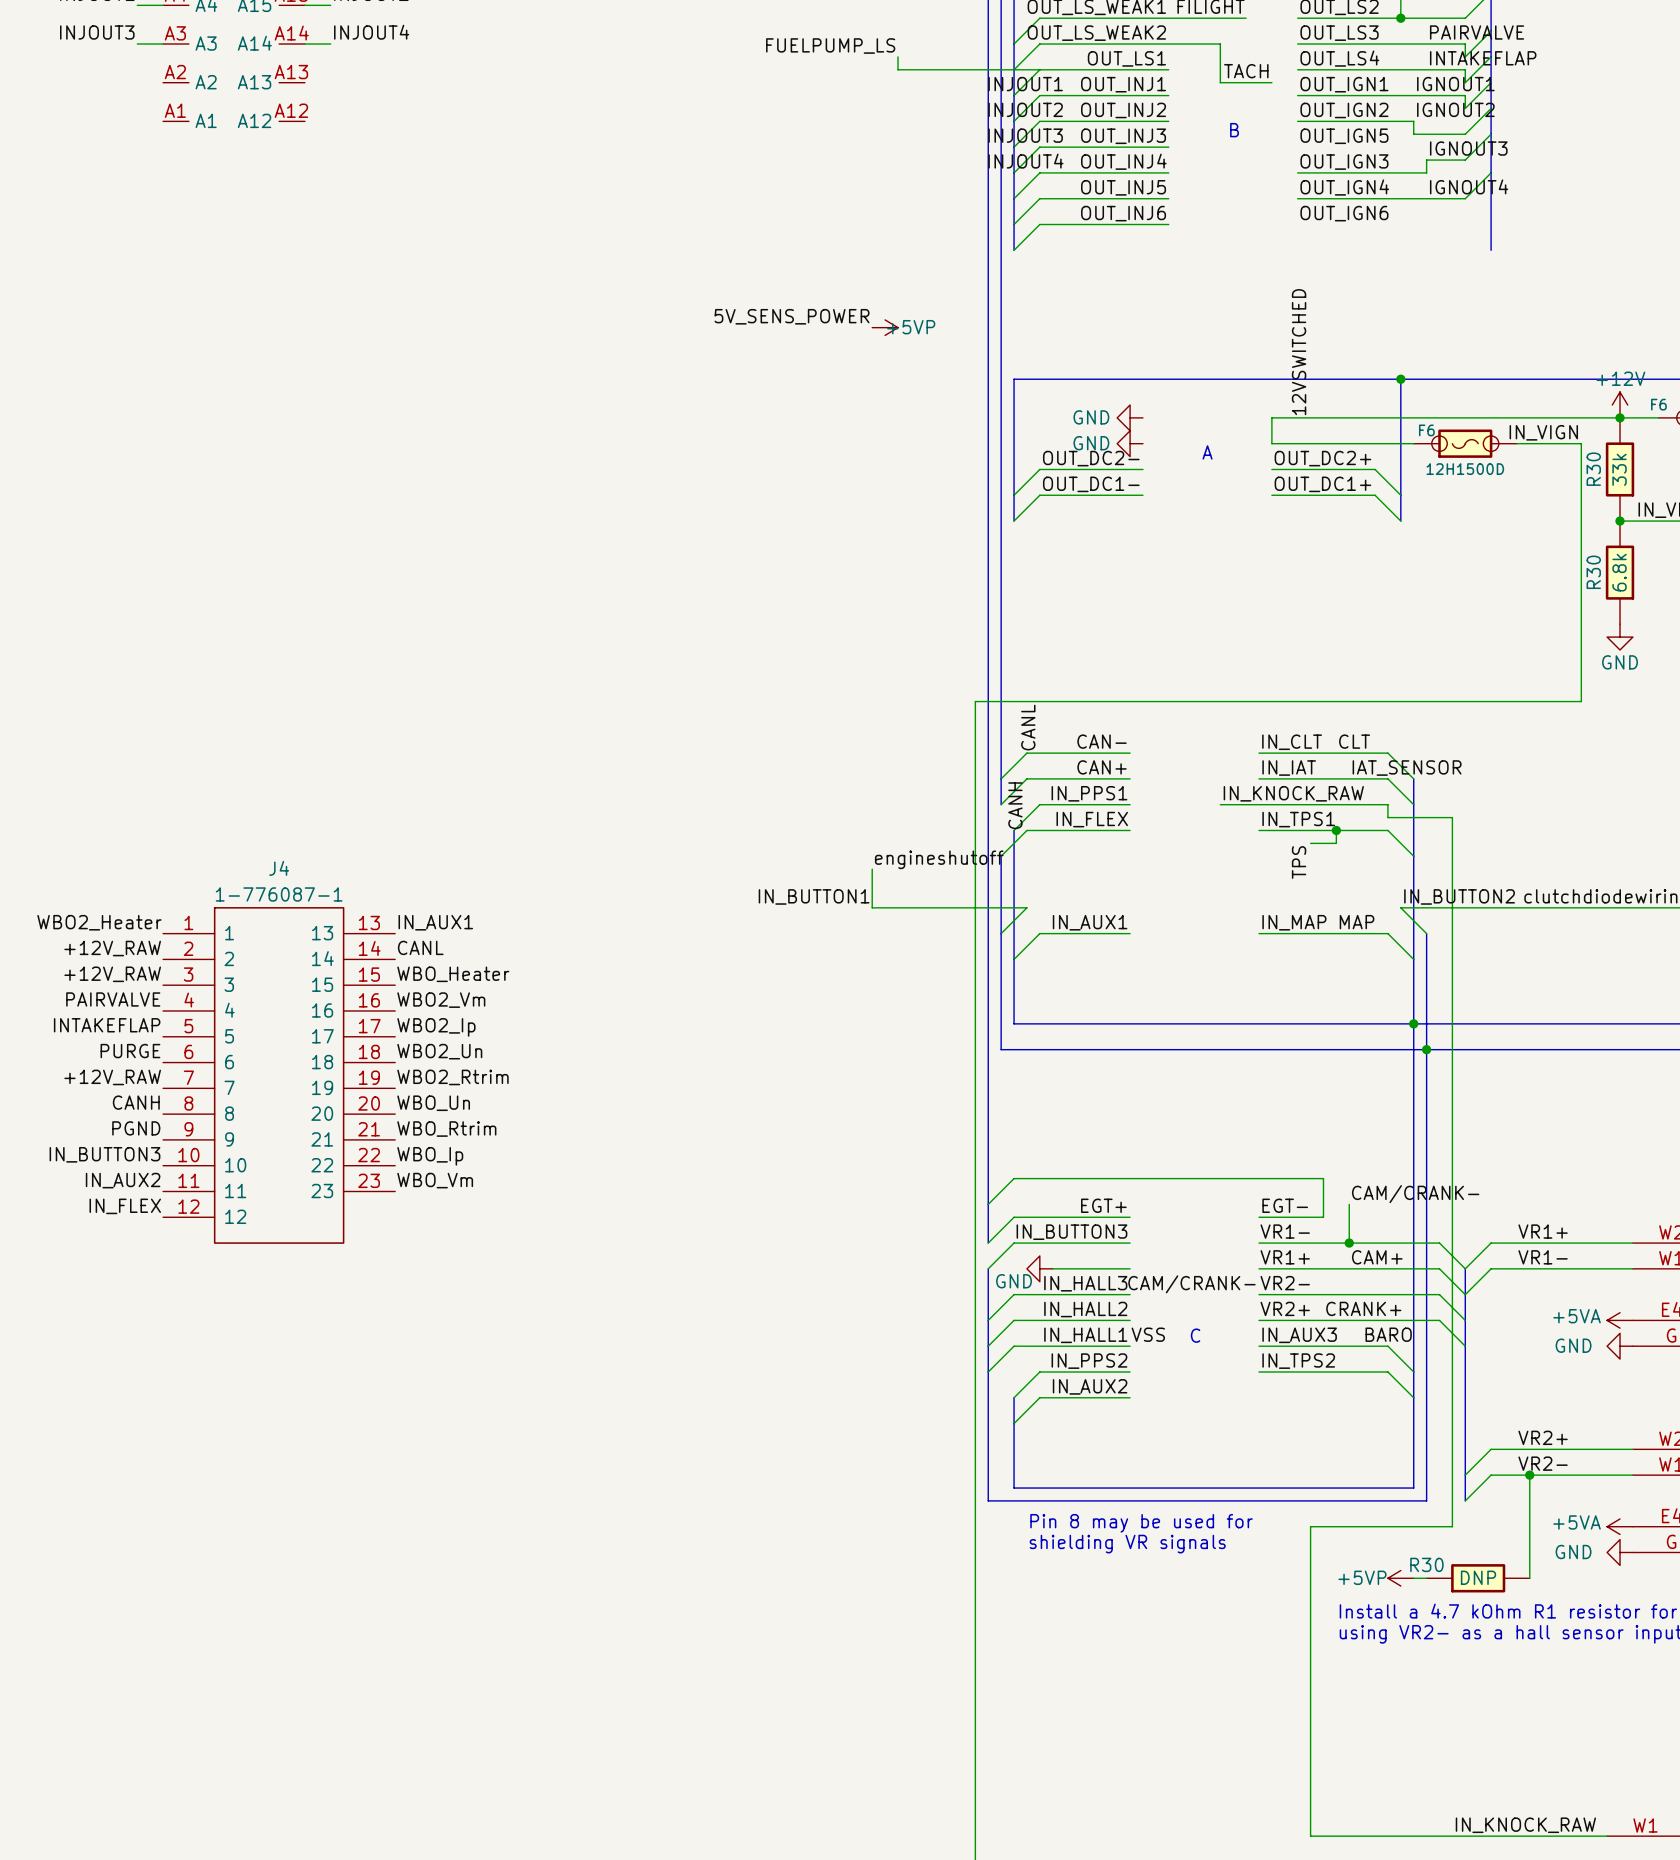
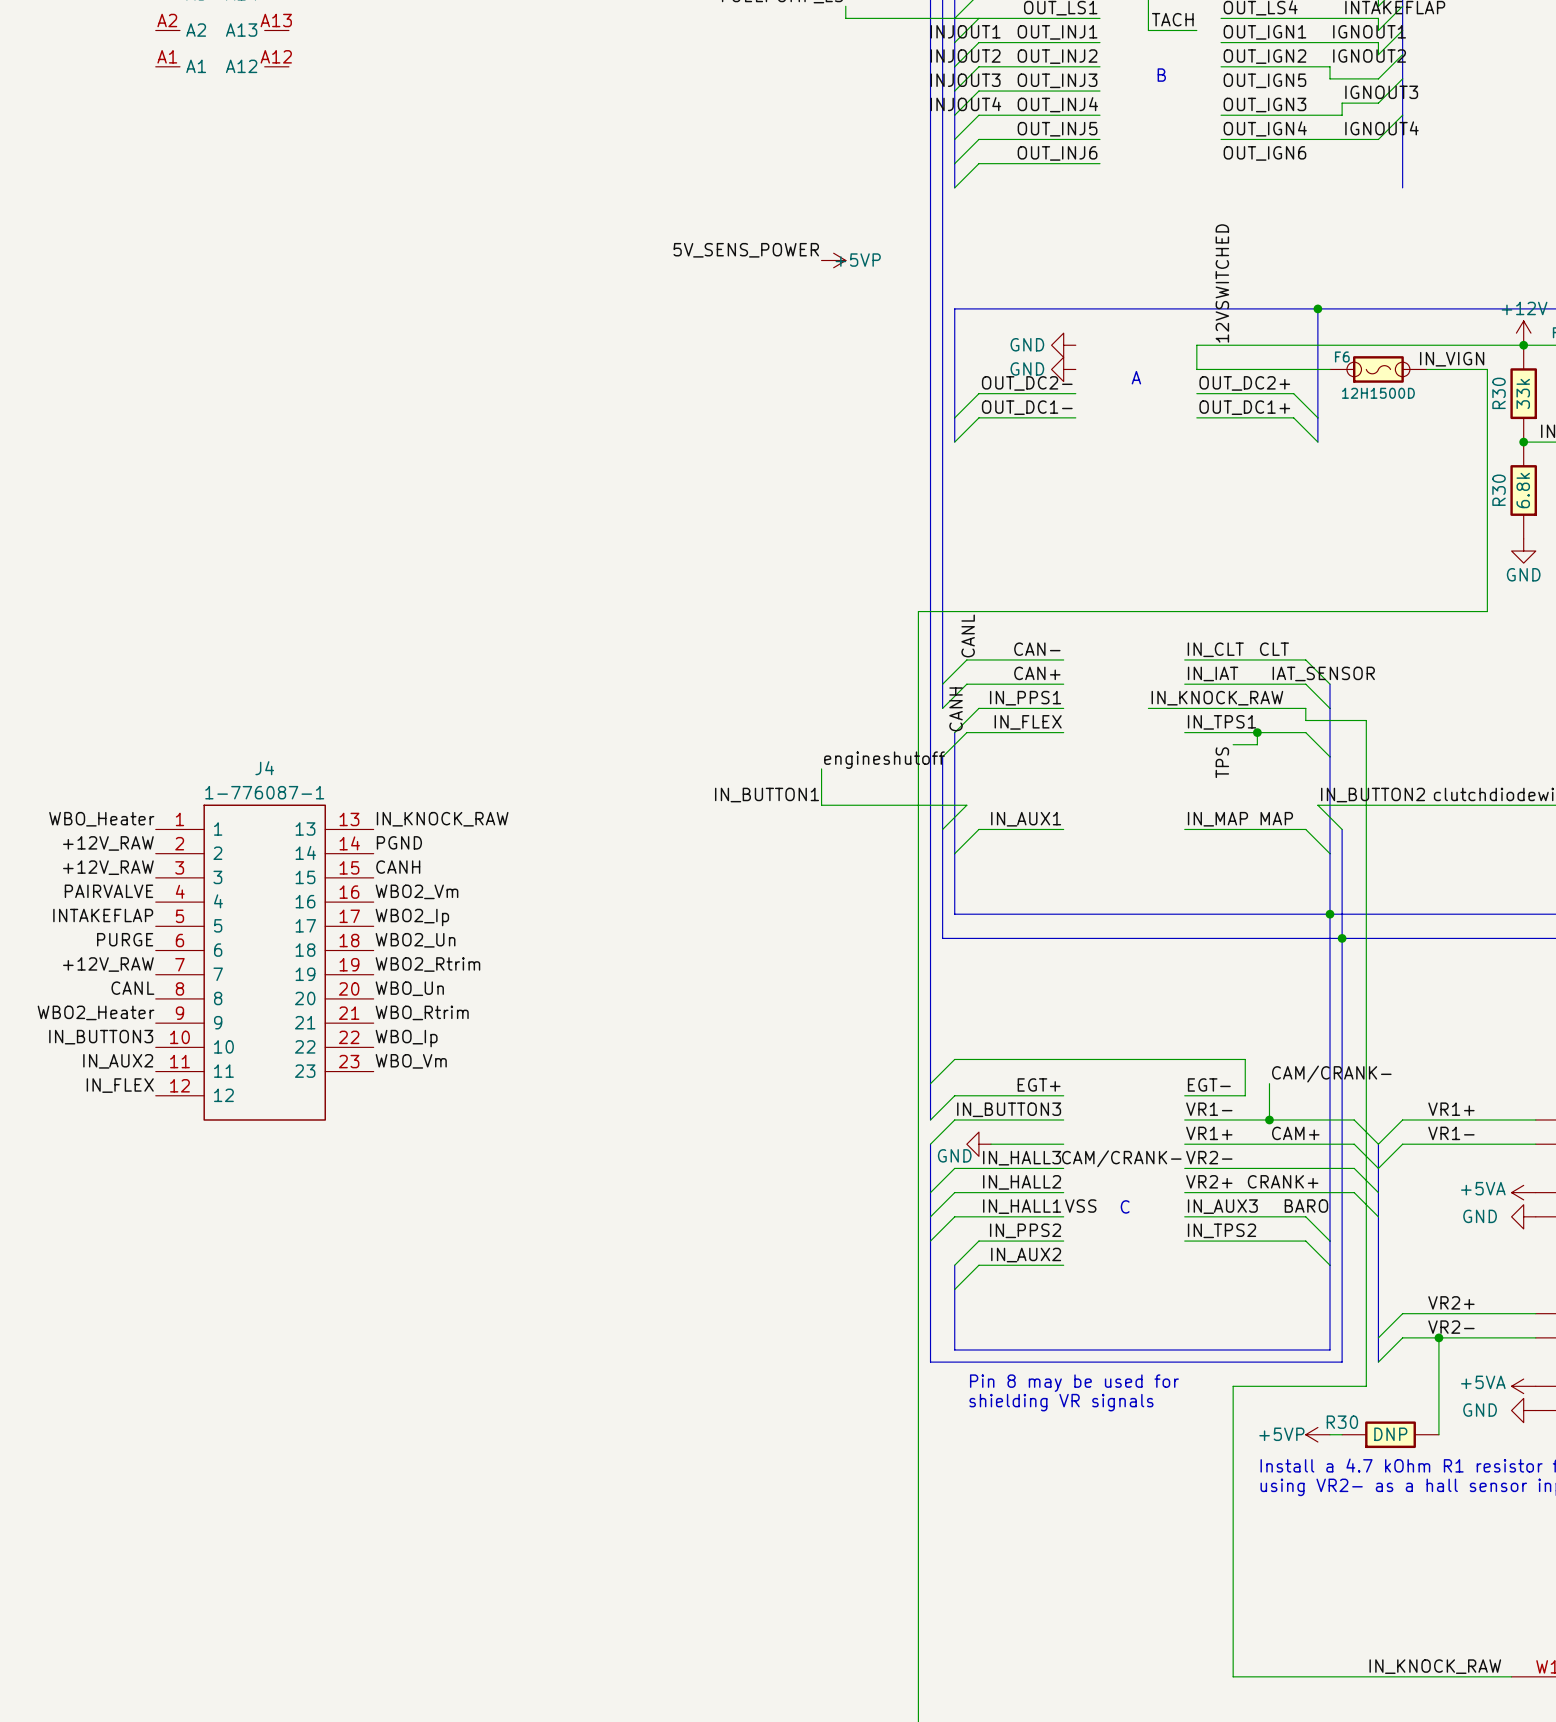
label: WBO2_Heater (99, 922) -> WBO_Heater (101, 819)
label: IN_AUX1 (435, 922) -> IN_KNOCK_RAW (442, 819)
label: CANL (420, 947) -> PGND (399, 842)
label: WBO_Heater (453, 974) -> CANH (398, 867)
label: CANH (136, 1102) -> CANL (132, 988)
label: PGND (136, 1128) -> WBO2_Heater (96, 1012)

